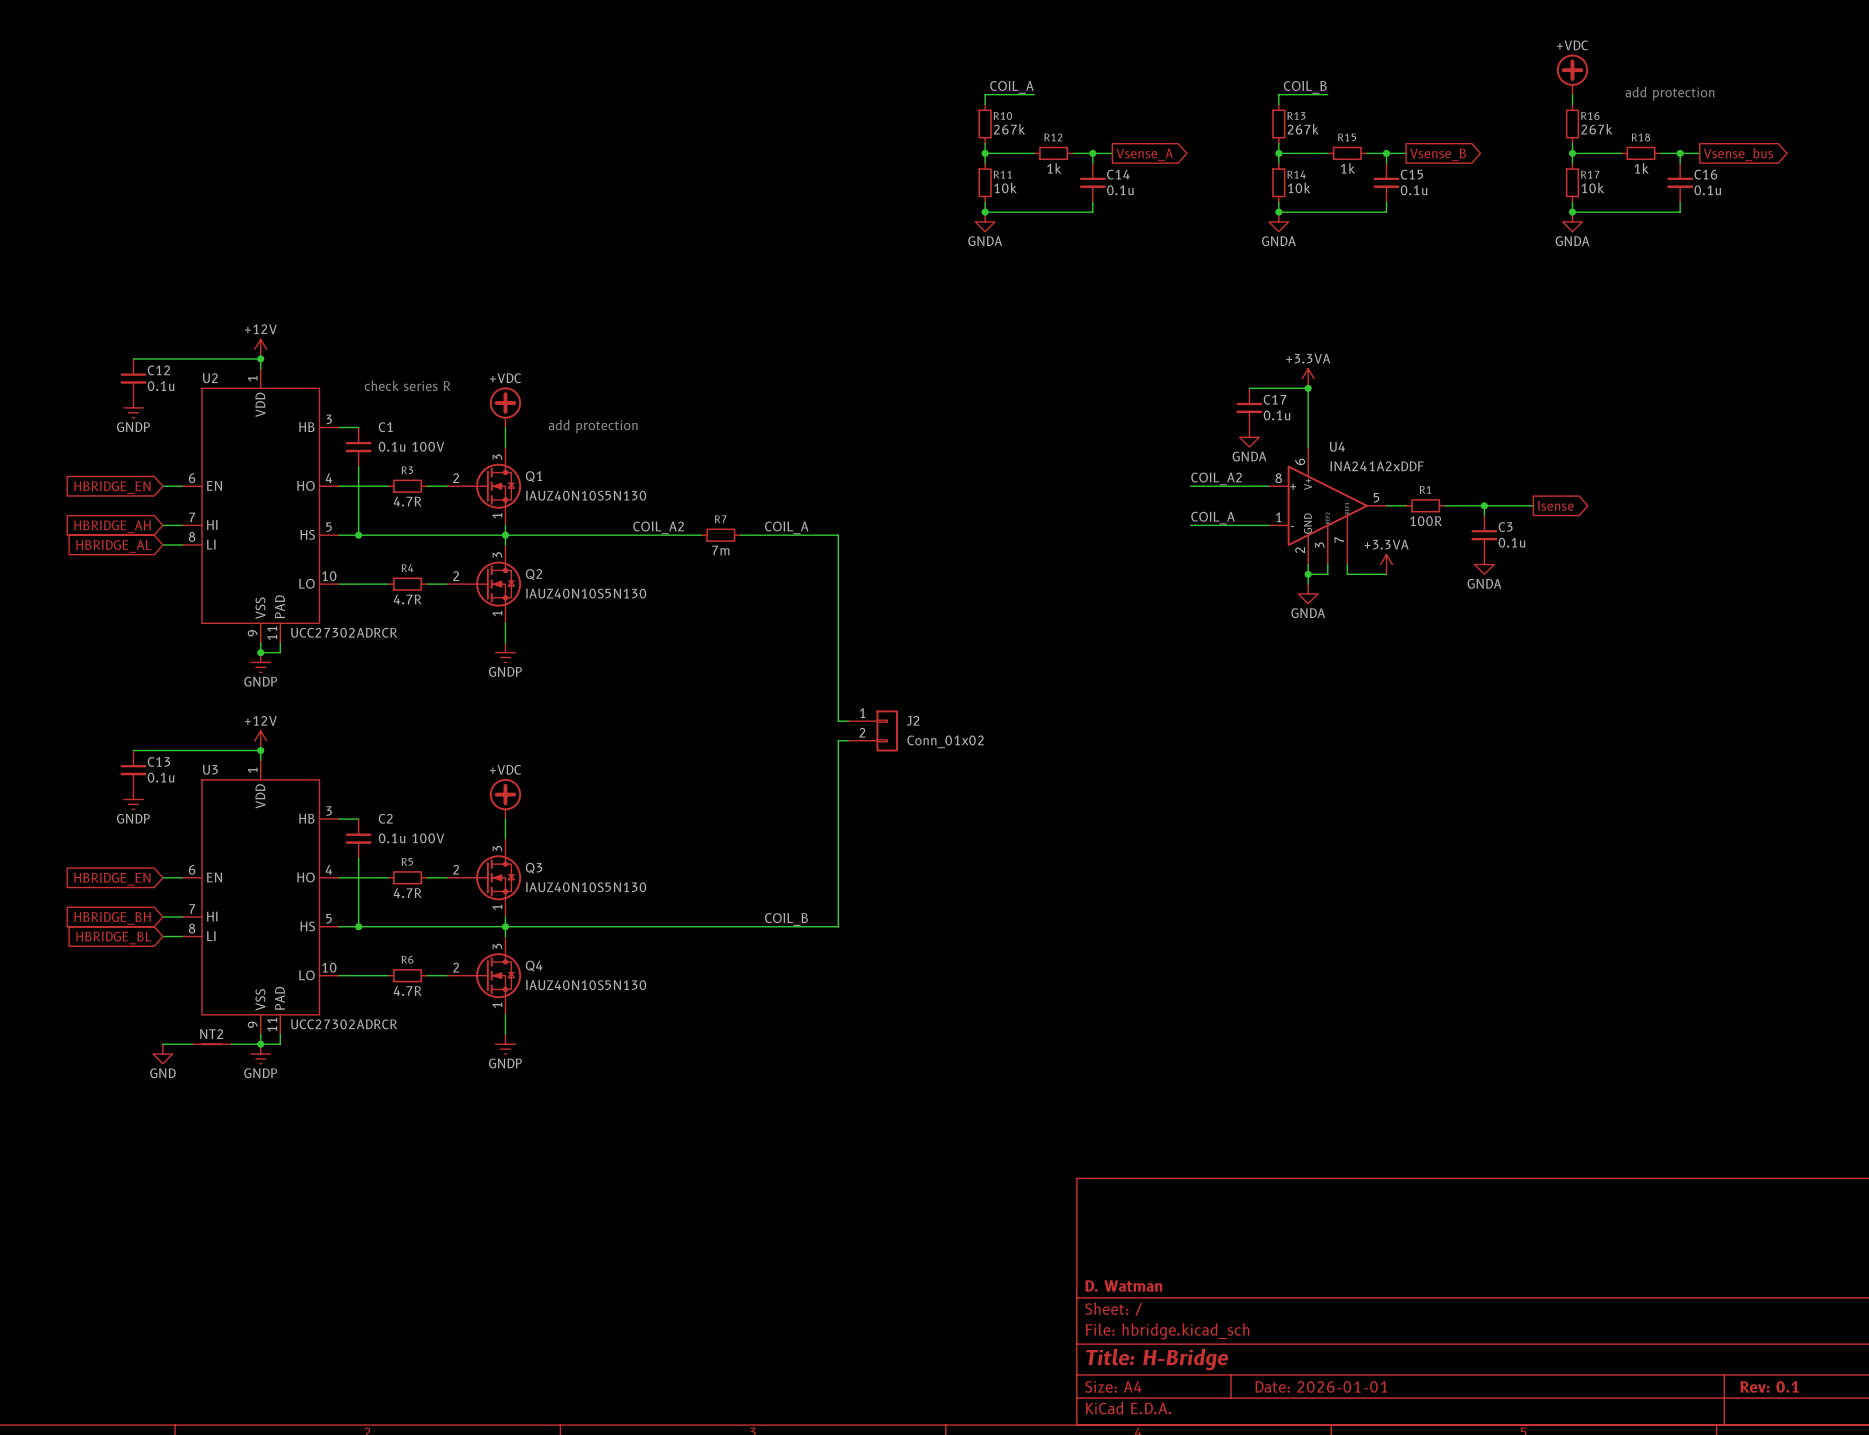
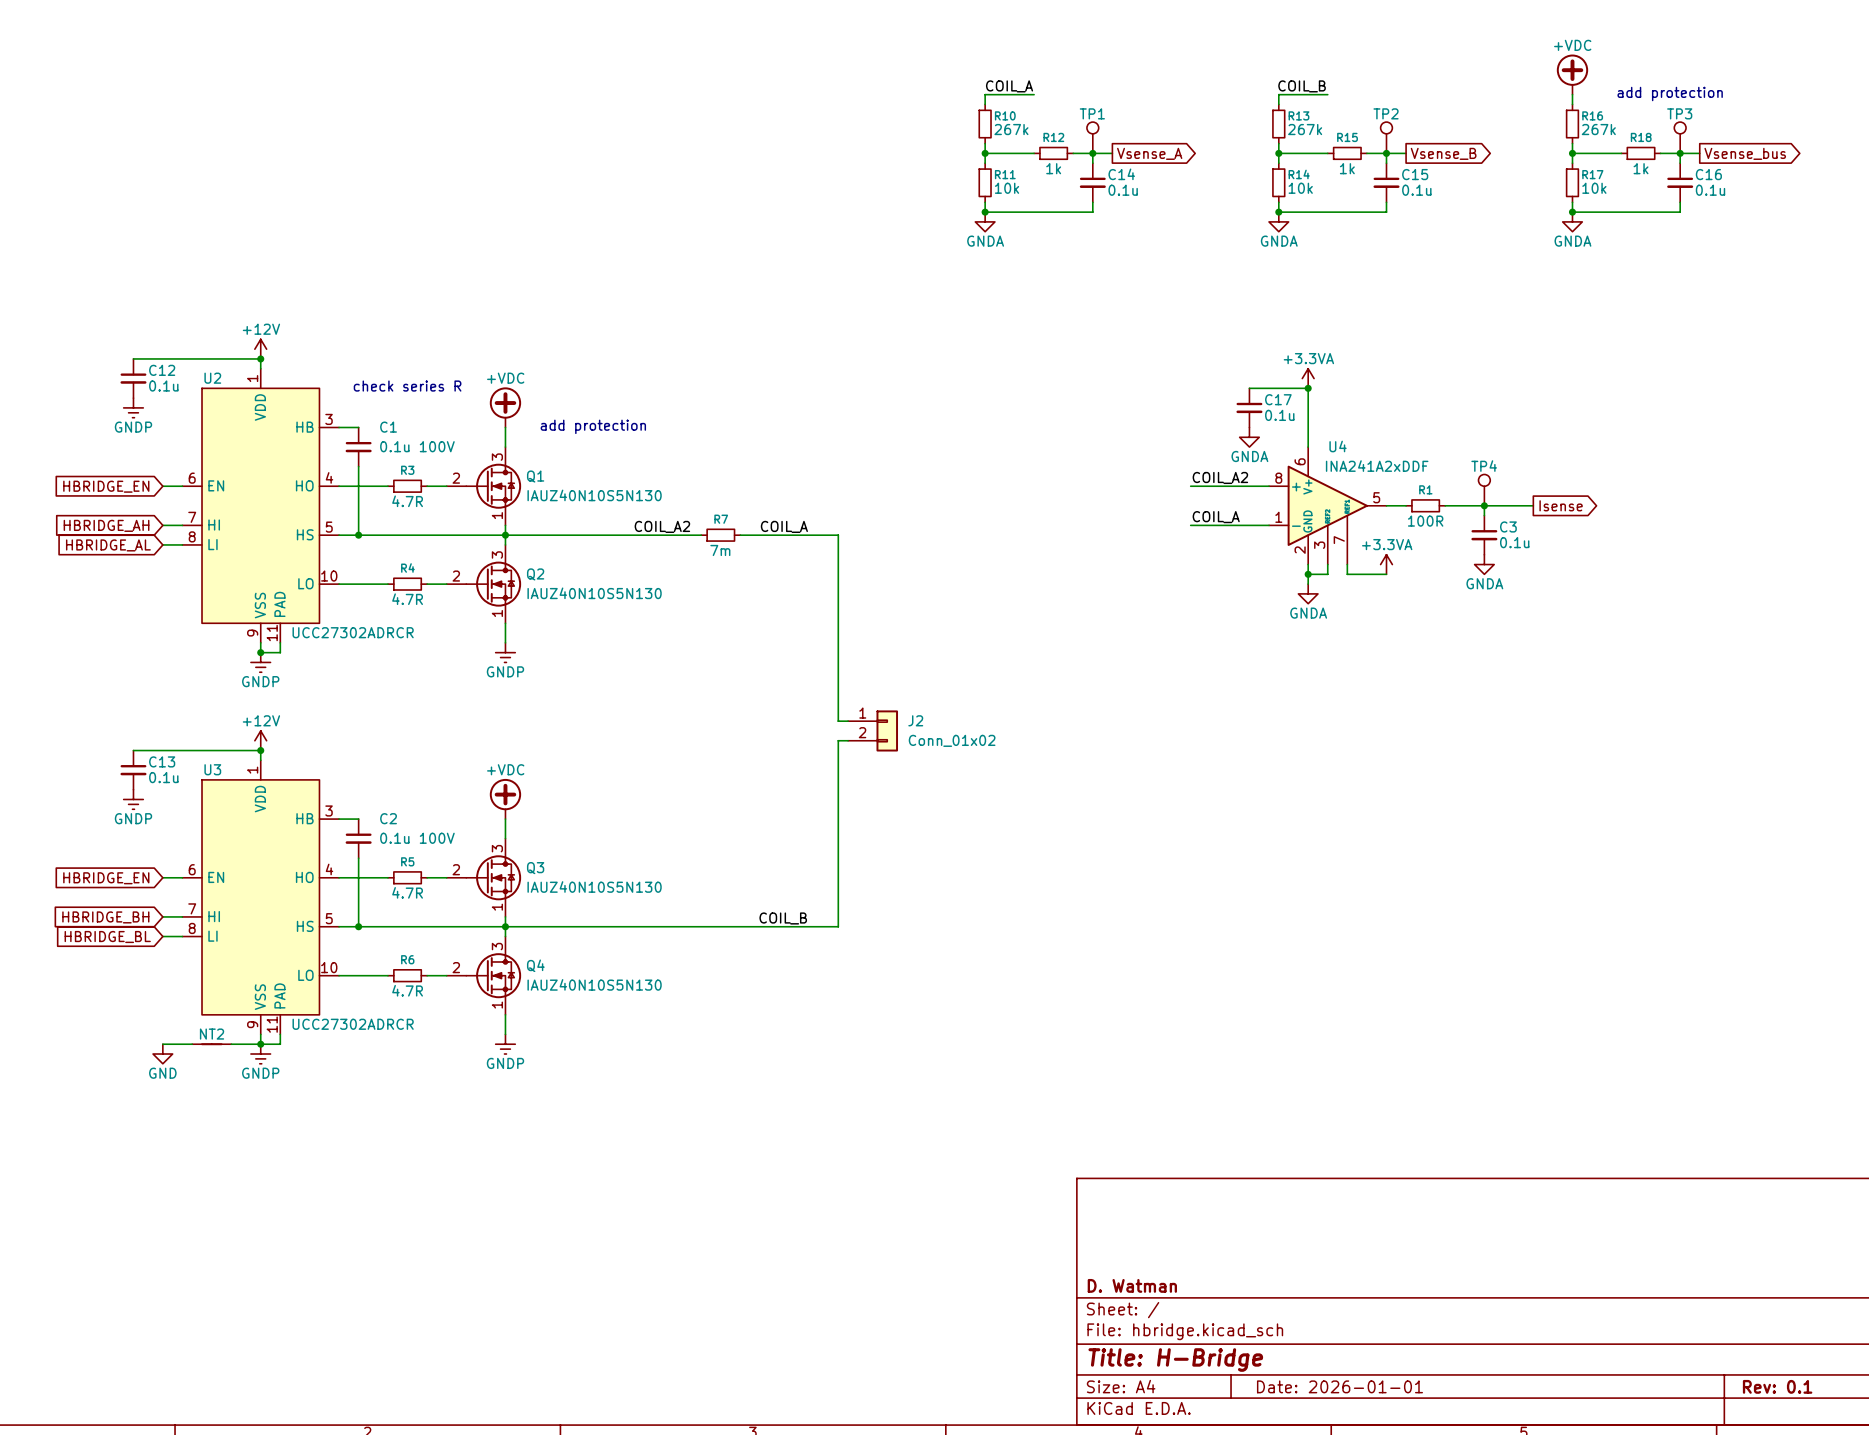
TP1: none -> (1092, 137)
TP2: none -> (1386, 137)
TP3: none -> (1680, 137)
TP4: none -> (1484, 490)

